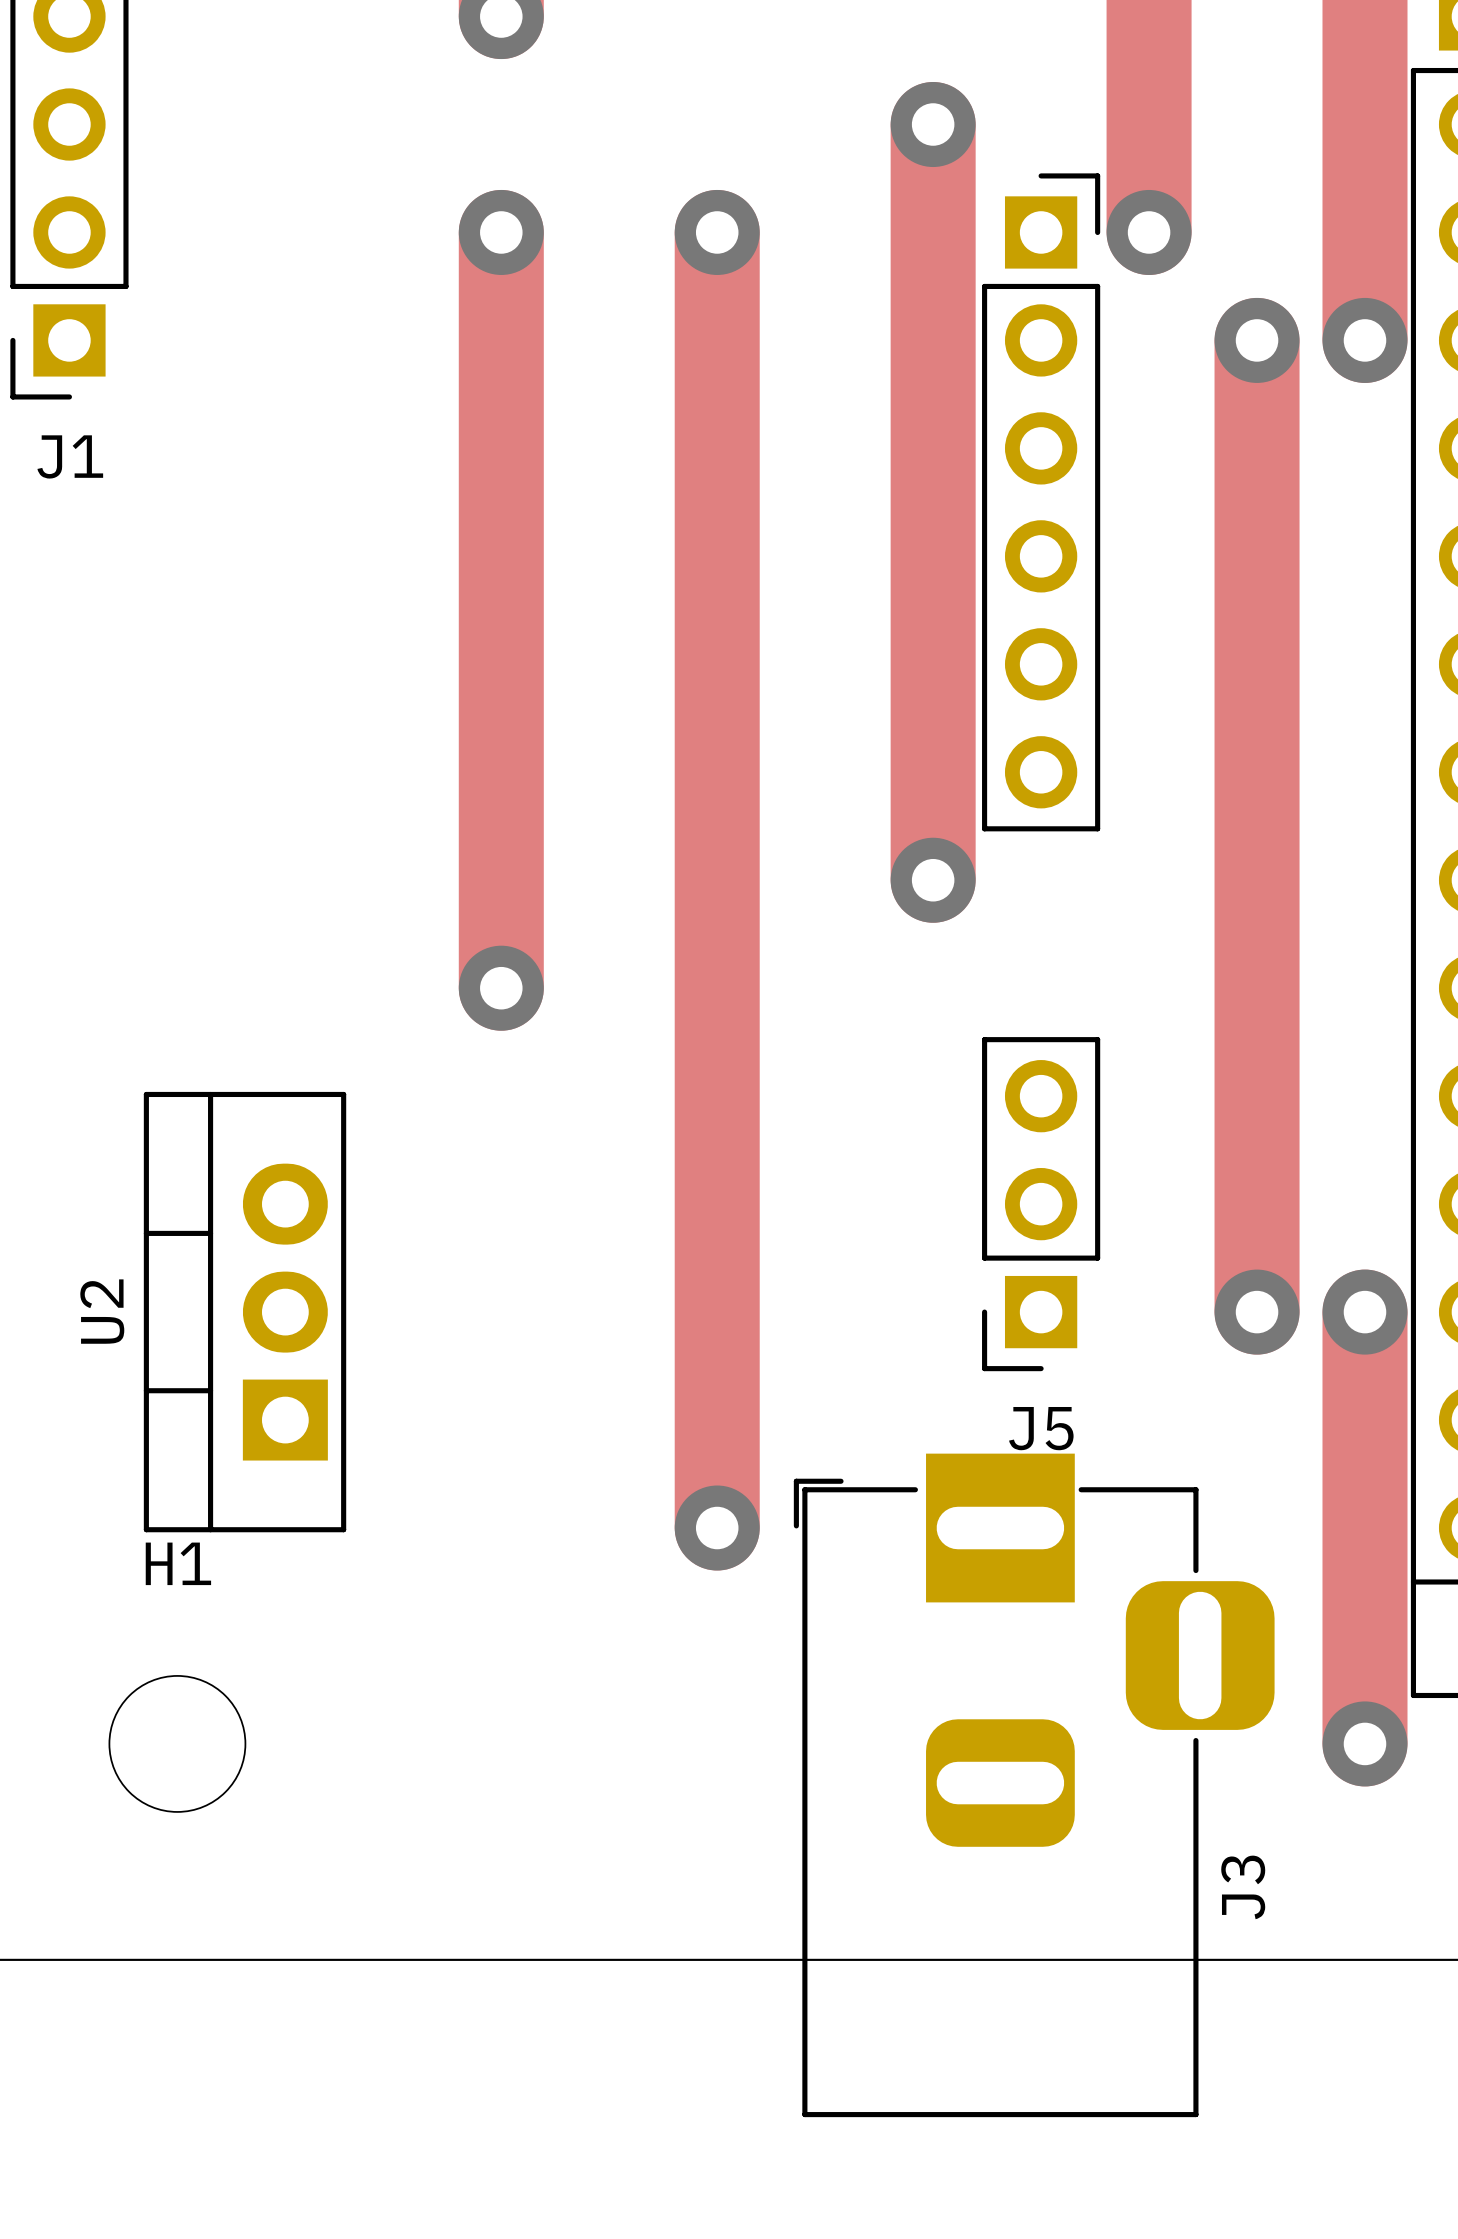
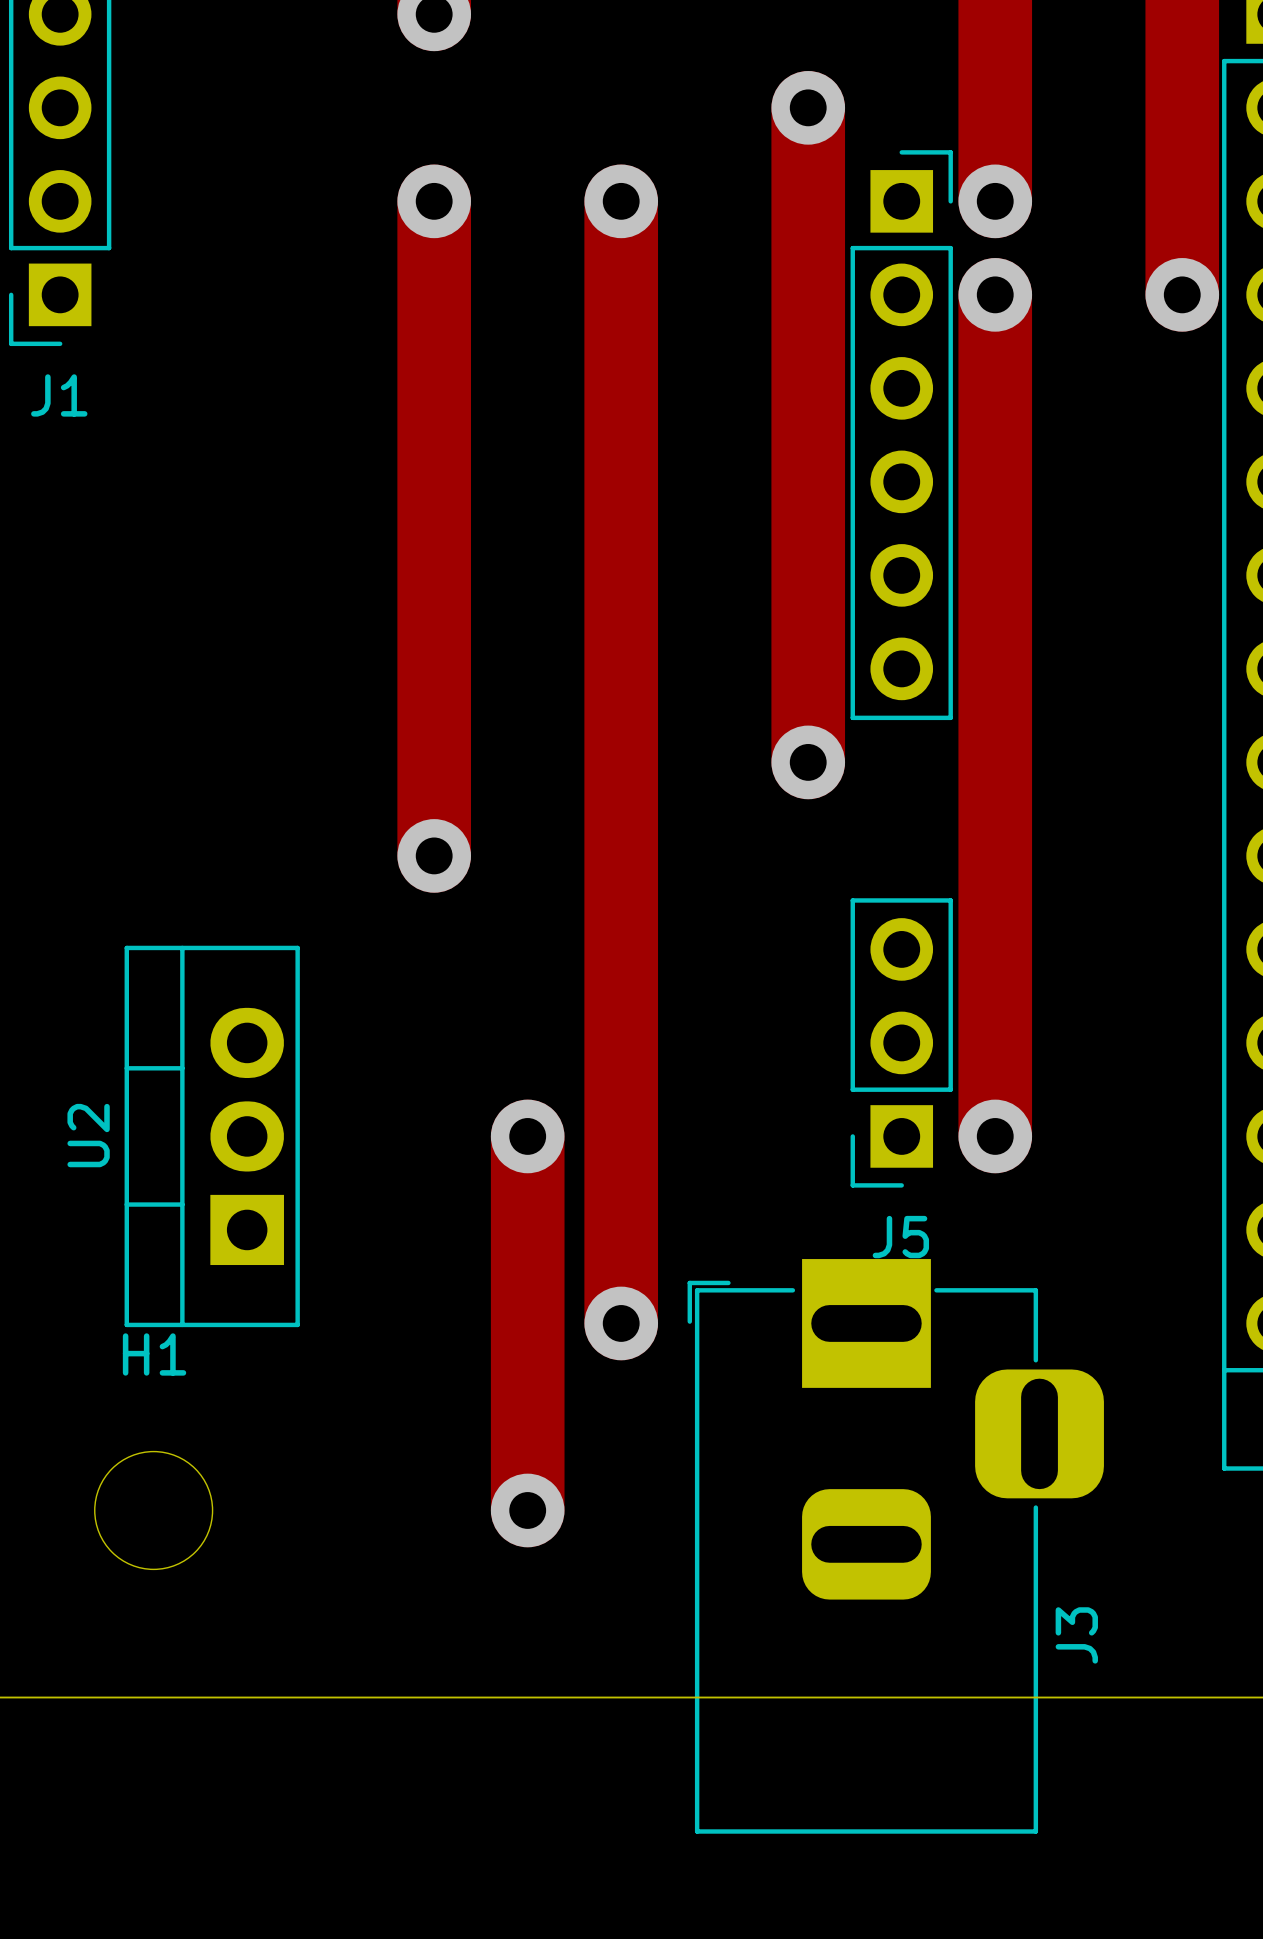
track: (1257, 340) (1257, 1312) -> (995, 294) (995, 1136)
via position: (1257, 340) -> (995, 294)
via: none -> (527, 1136)
via: none -> (995, 1136)
via: (1257, 1312) -> none
track: (1364, 1312) (1364, 1743) -> (527, 1136) (527, 1510)
via: (1364, 1312) -> none
via: none -> (527, 1510)
via: (1364, 1743) -> none

